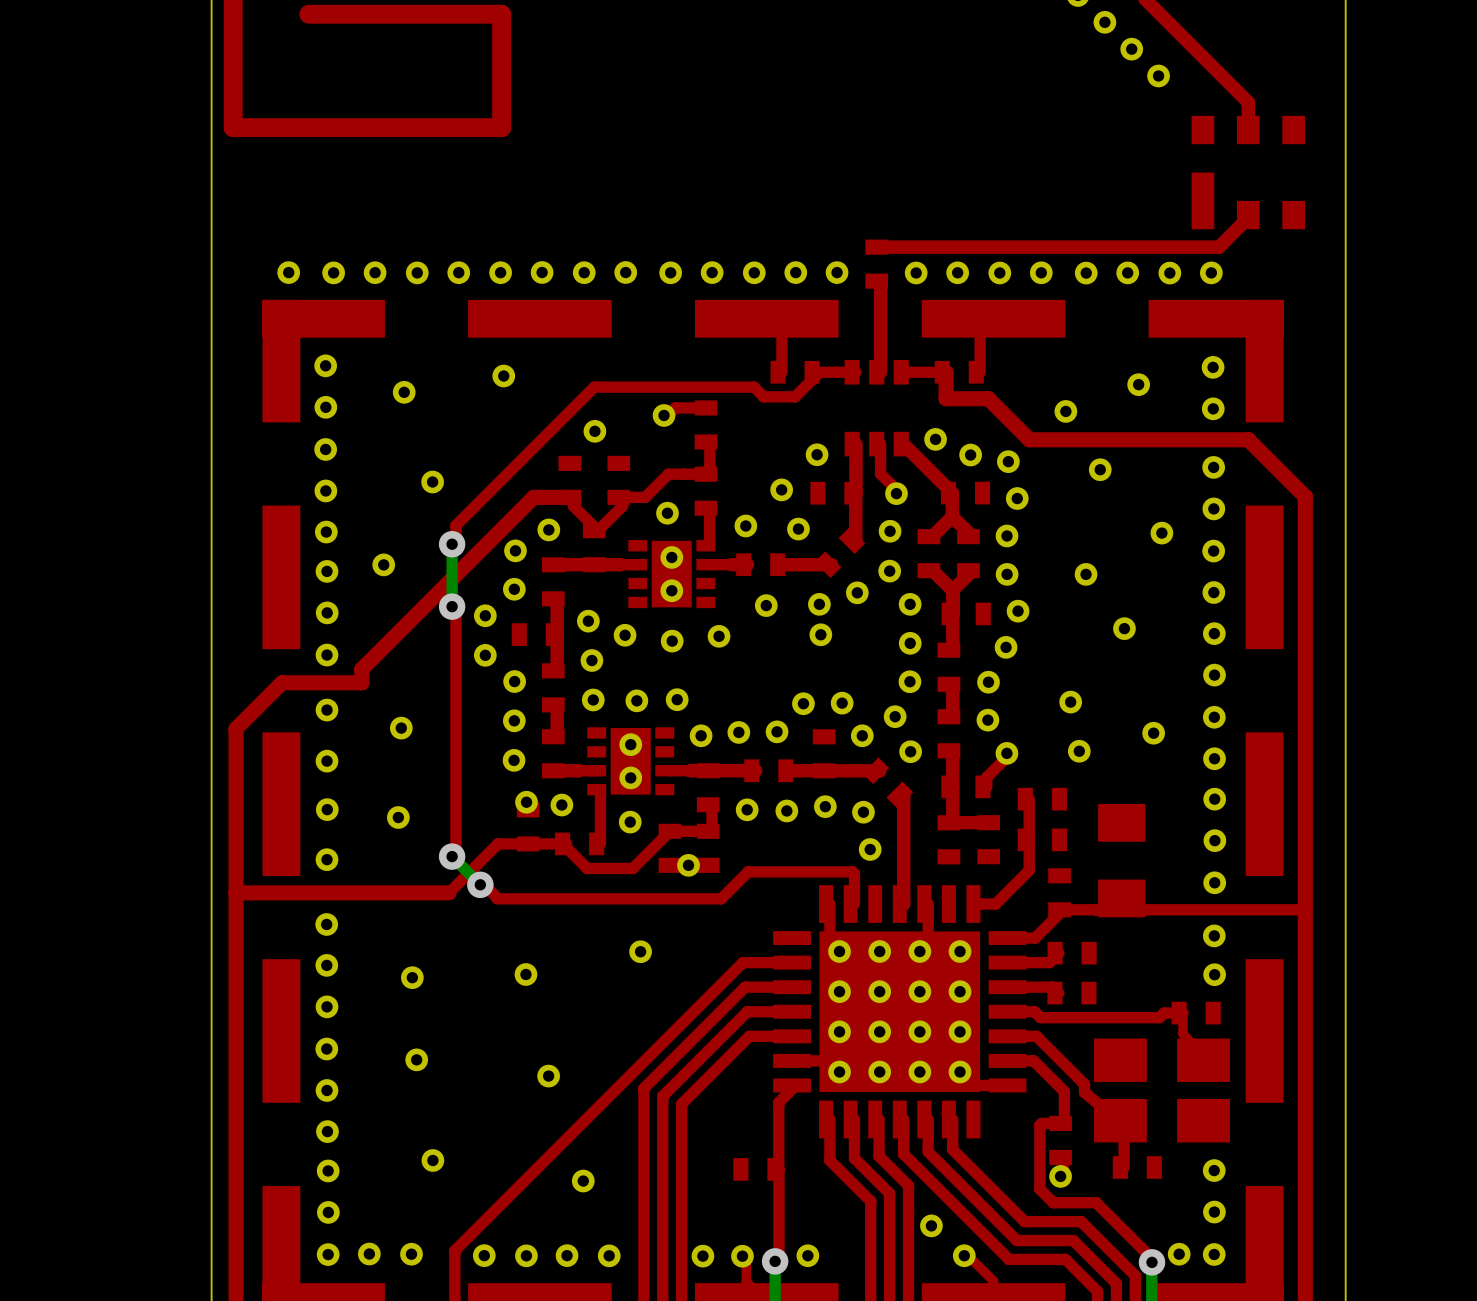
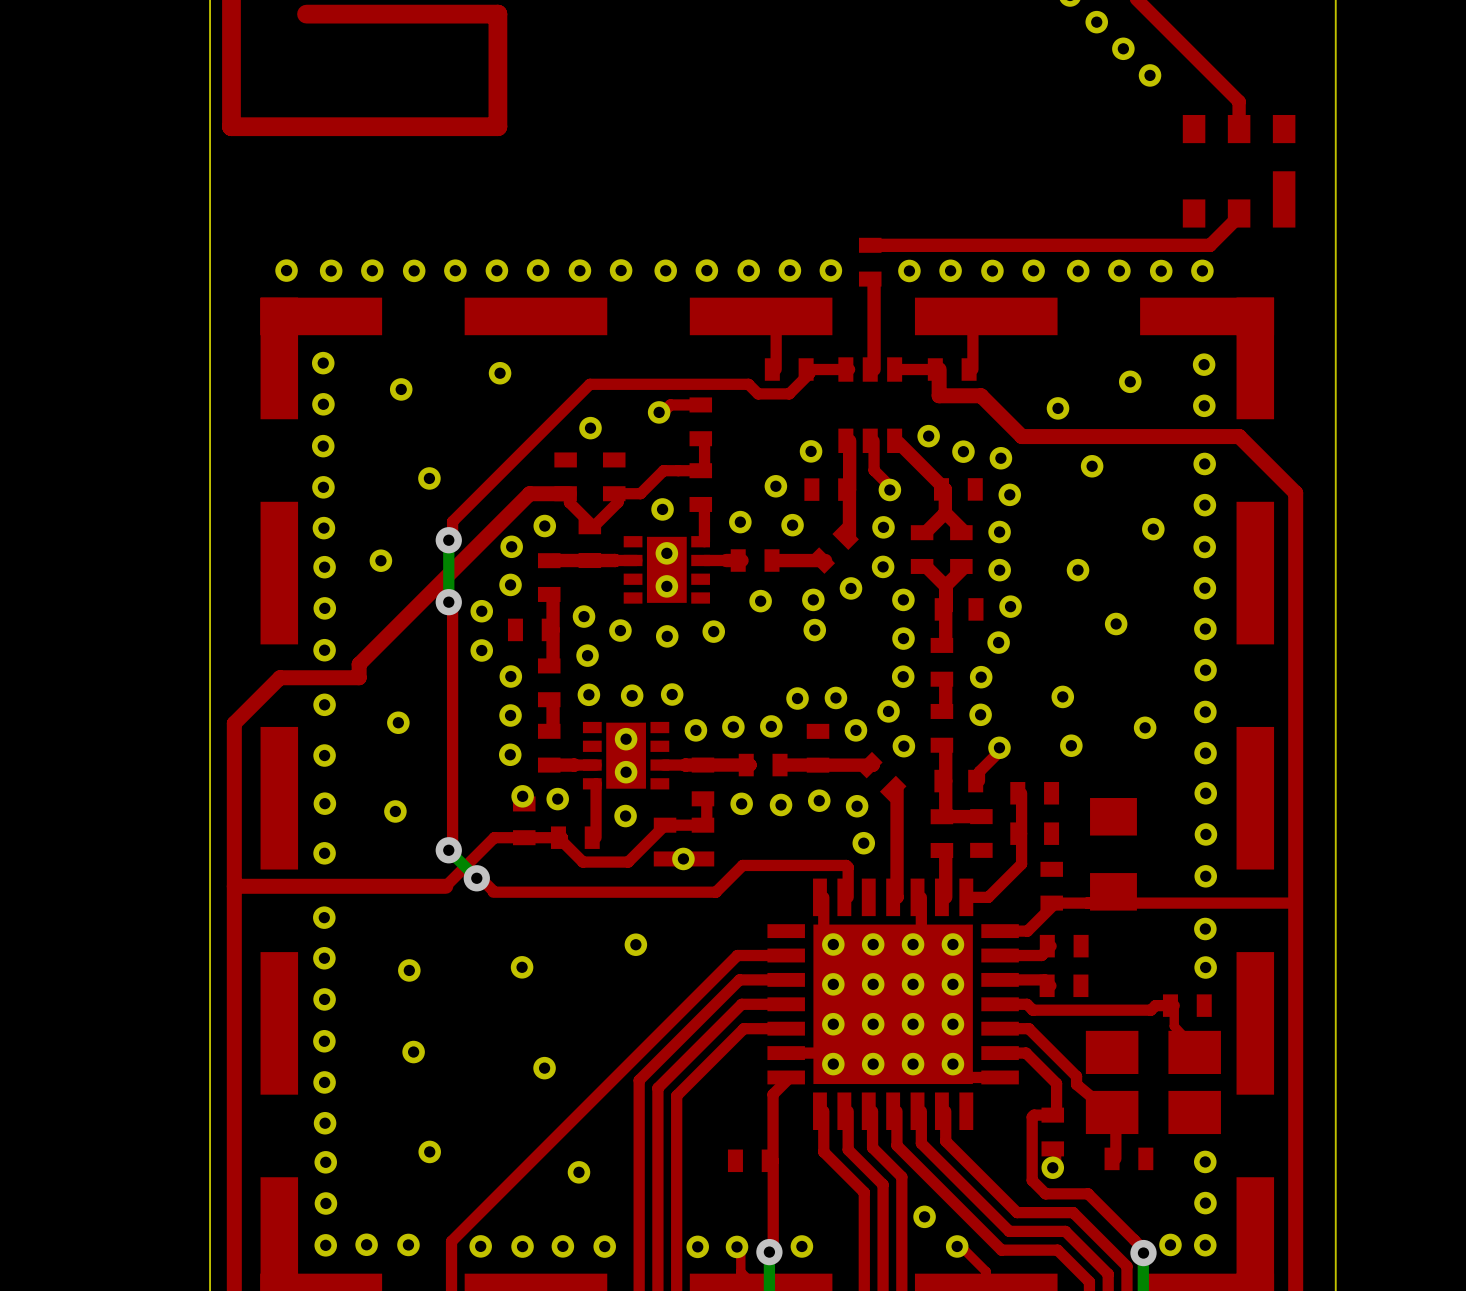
part footprint: [1191, 115, 1306, 230] -> [1182, 114, 1296, 228]
top track: none -> (941, 850) (945, 854) (945, 897)

